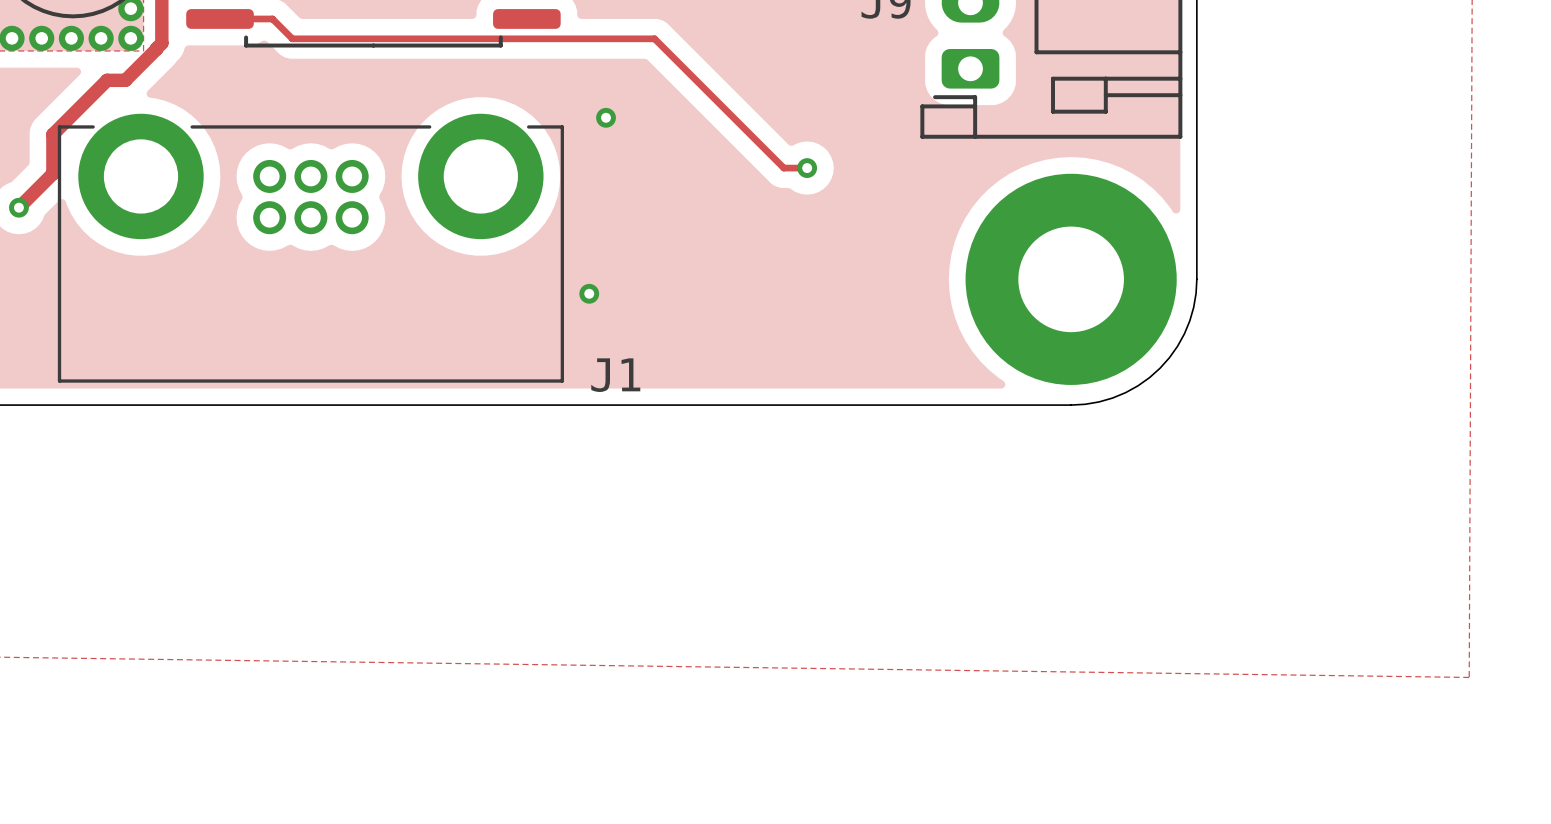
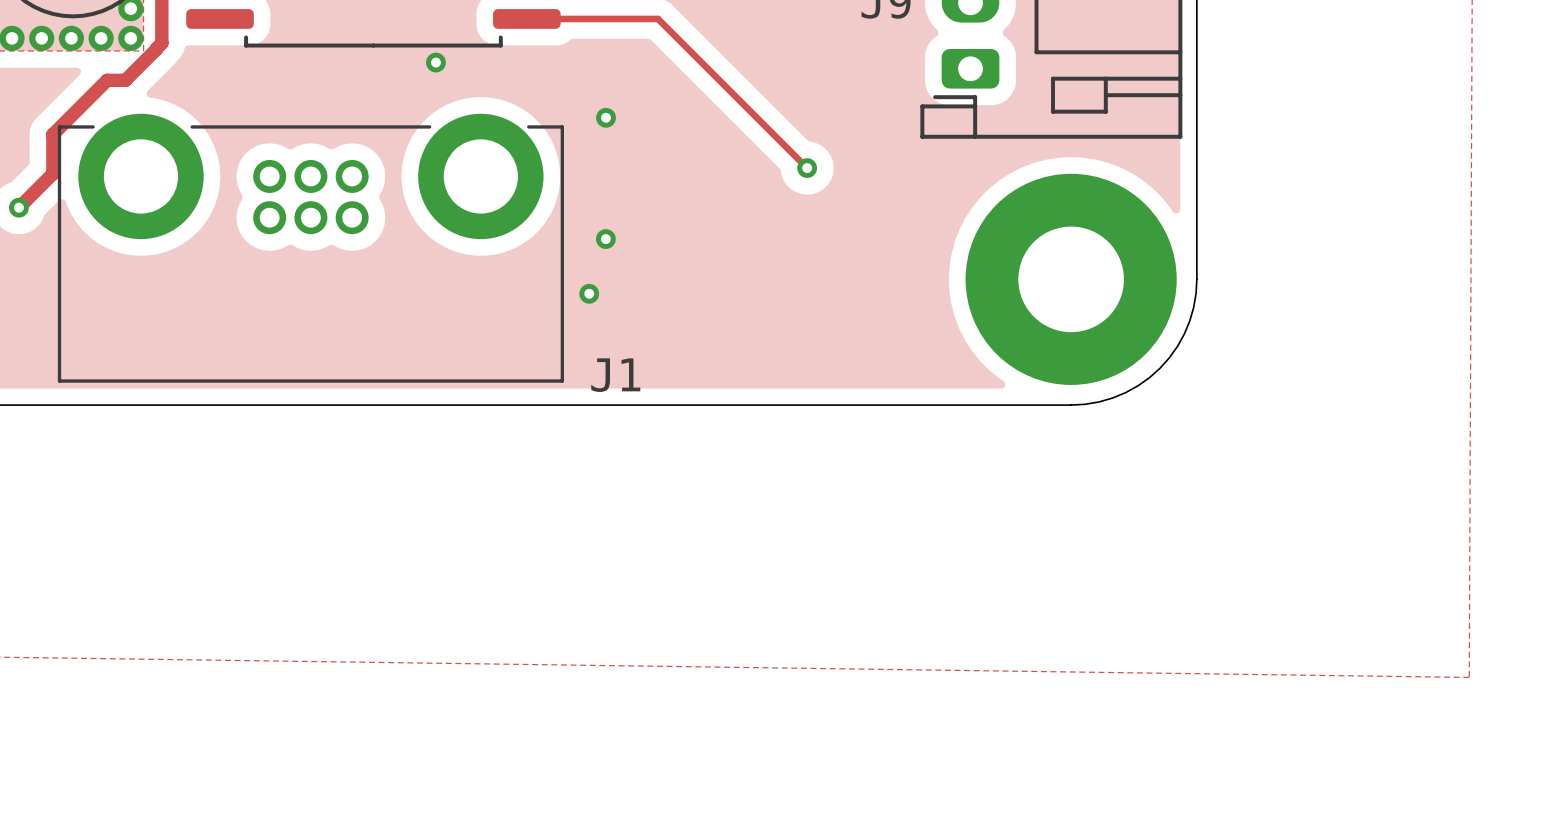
track: (220, 18) (272, 18) (292, 38) (654, 38) (783, 168) (807, 168) -> (526, 18) (658, 18) (807, 168)
via: none -> (435, 62)
via: none -> (605, 239)

